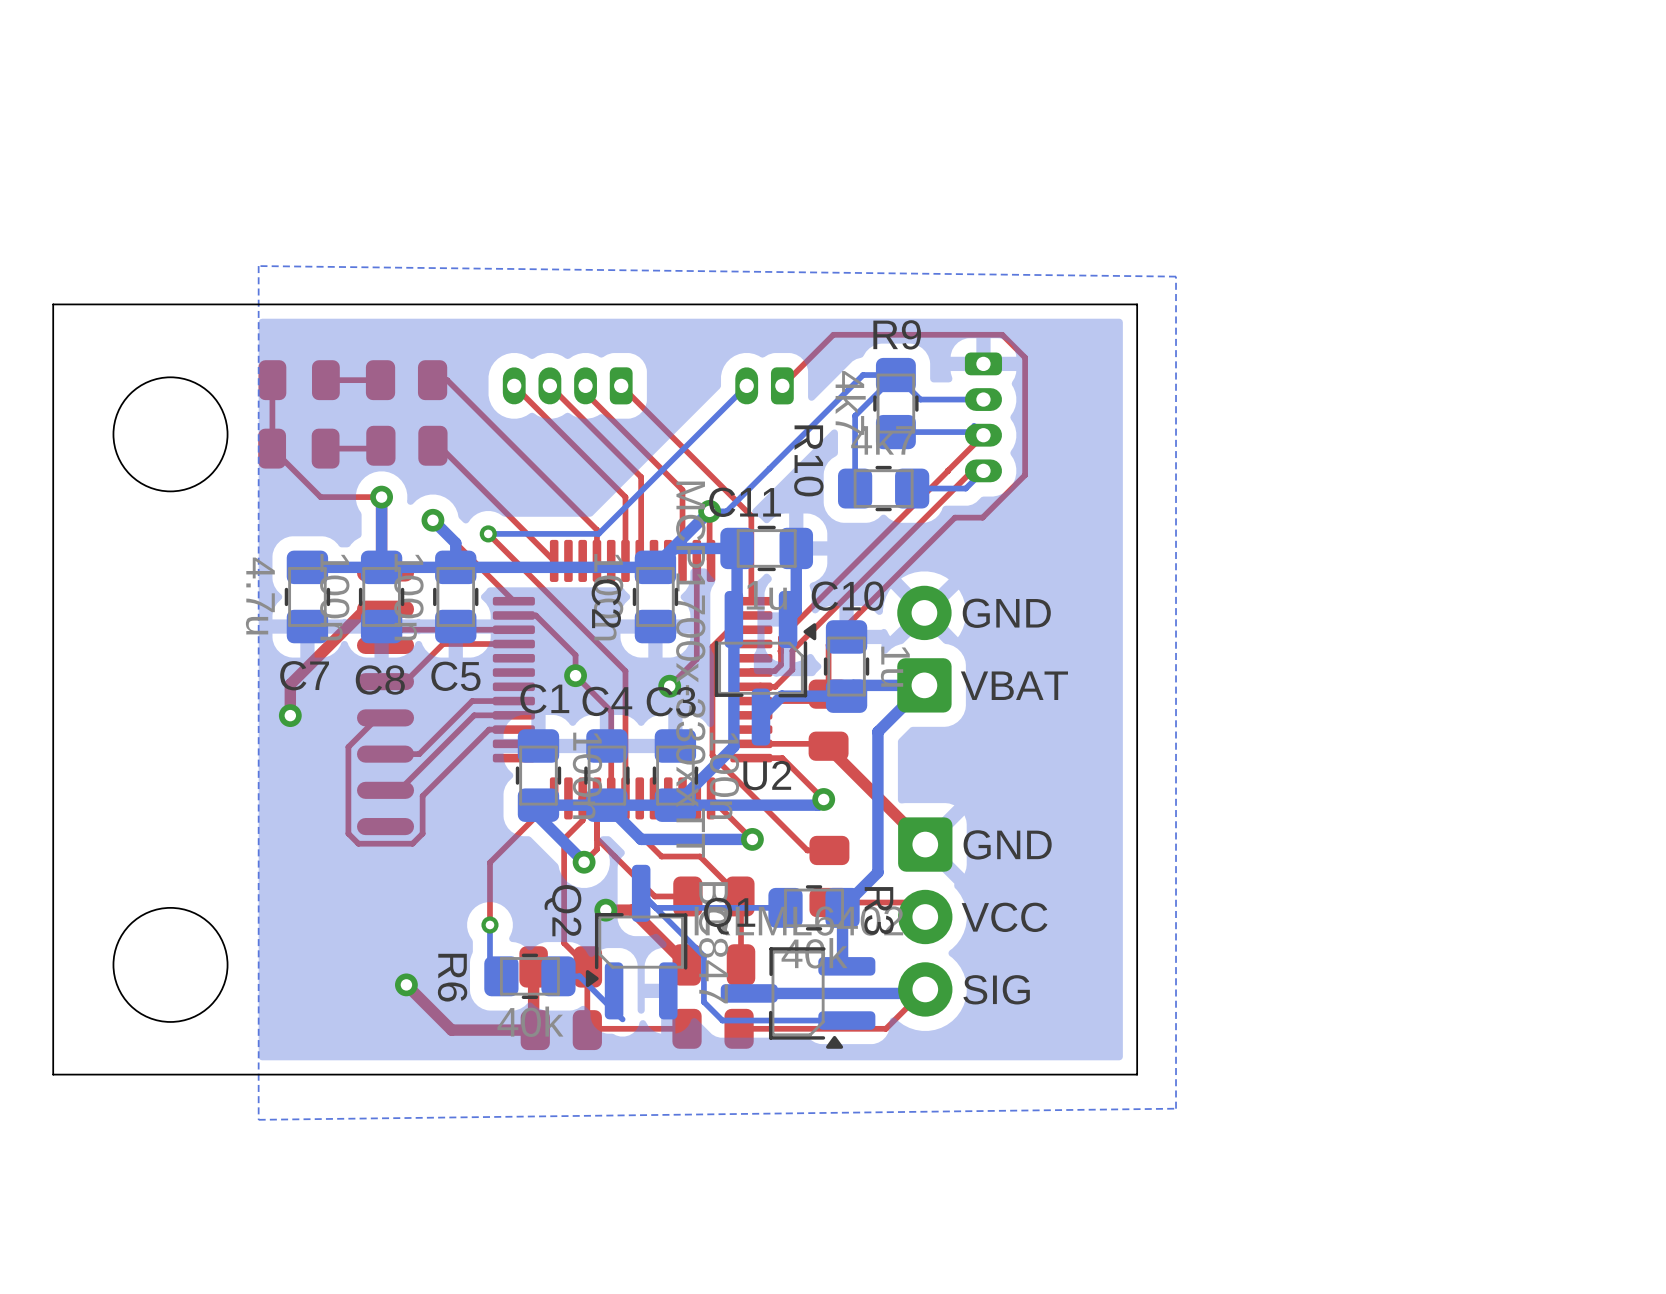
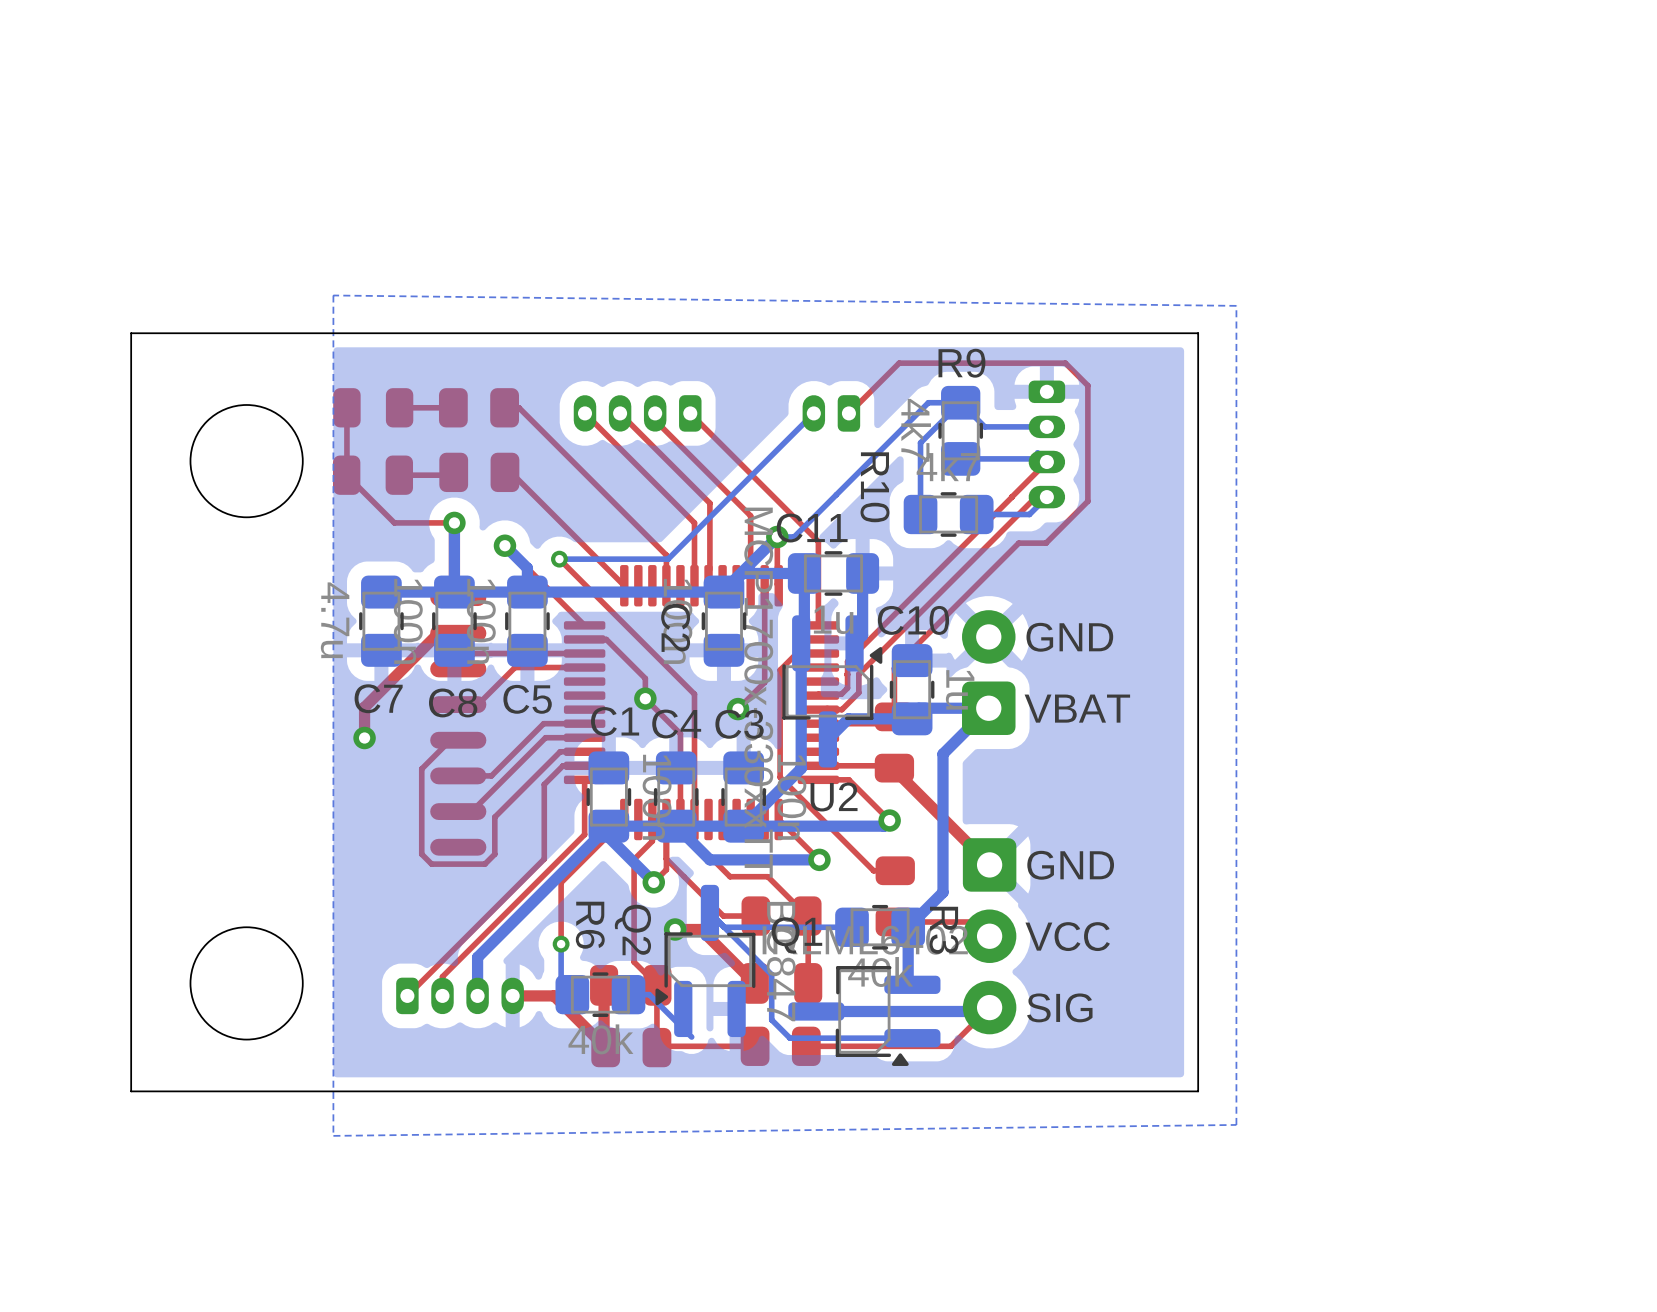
top track: none -> (584, 765) (562, 765) (544, 784) (544, 859) (407, 995)
top track: none -> (584, 779) (584, 834) (442, 976) (442, 995)
bottom track: none -> (608, 826) (477, 957) (477, 995)
part: none -> (460, 995)
top track: none -> (512, 995) (554, 995) (604, 1045)
R6 name position: R6 (452, 977) -> R6 (590, 925)
top track: (406, 984) (451, 1030) (535, 1030) -> none
via: (406, 984) -> none

